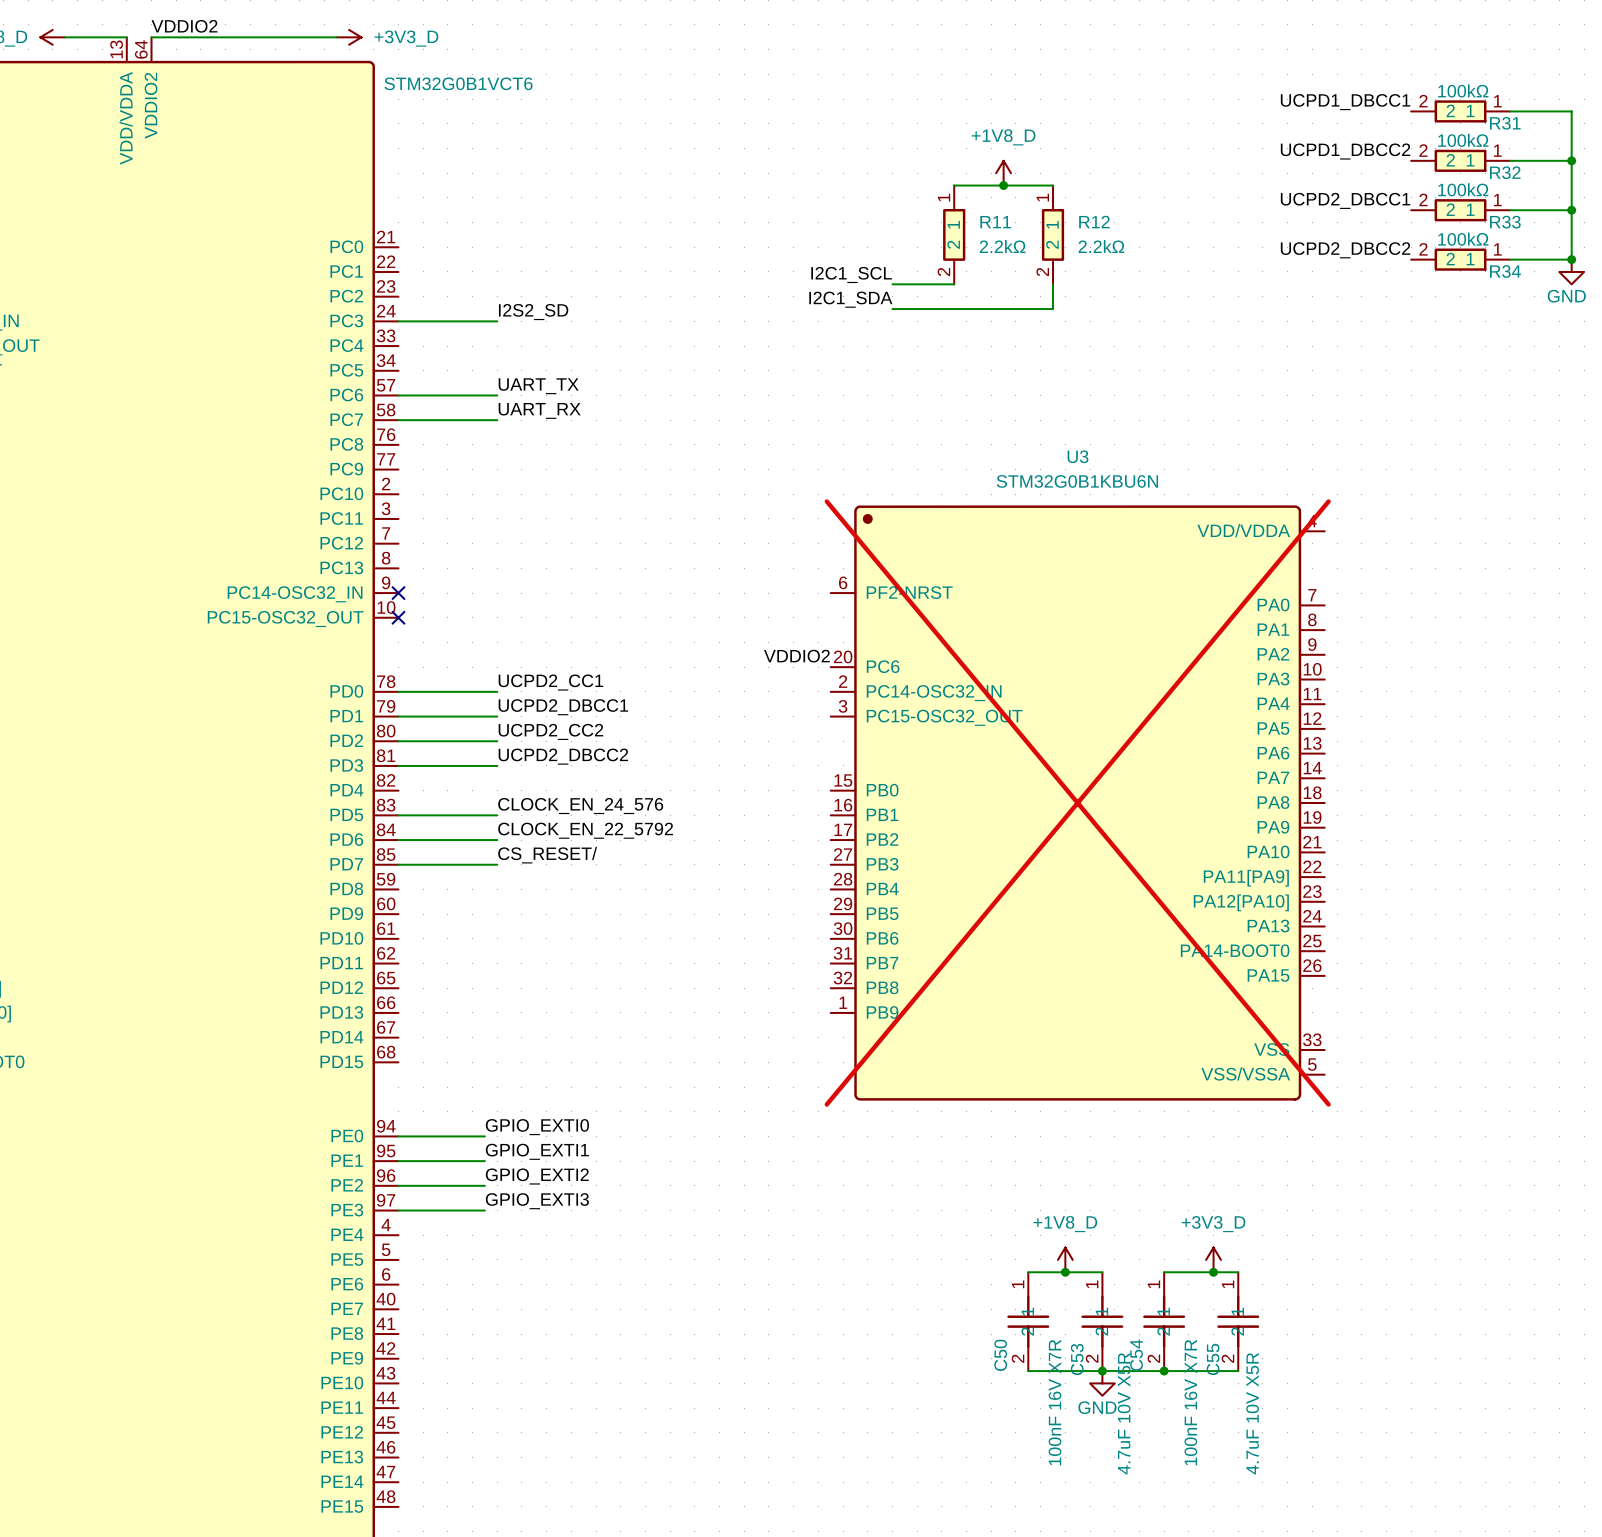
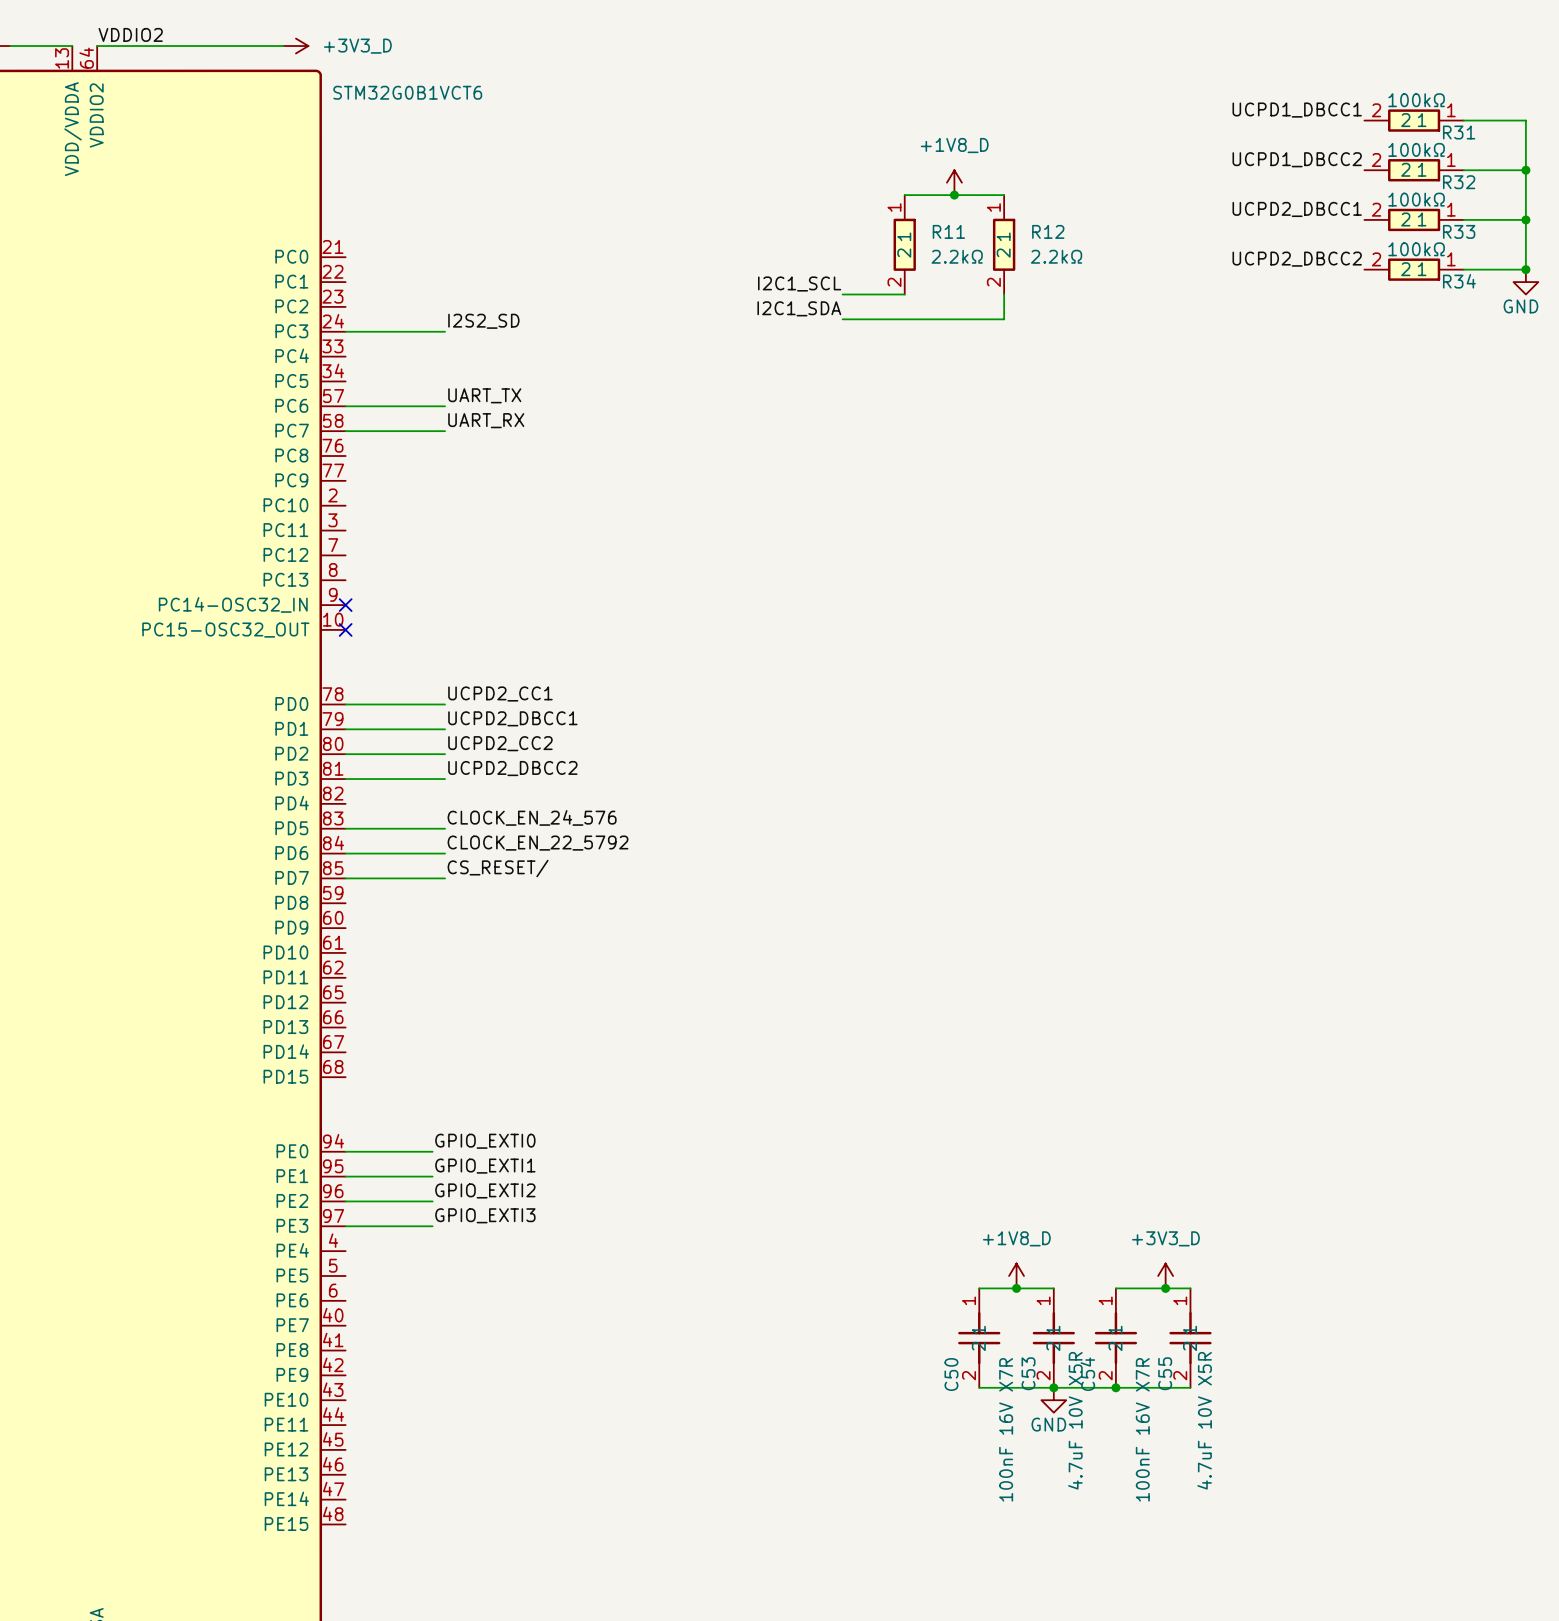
label: VDDIO2 (796, 656) -> none
U3: STM32G0B1KBU6N (1077, 803) -> none

